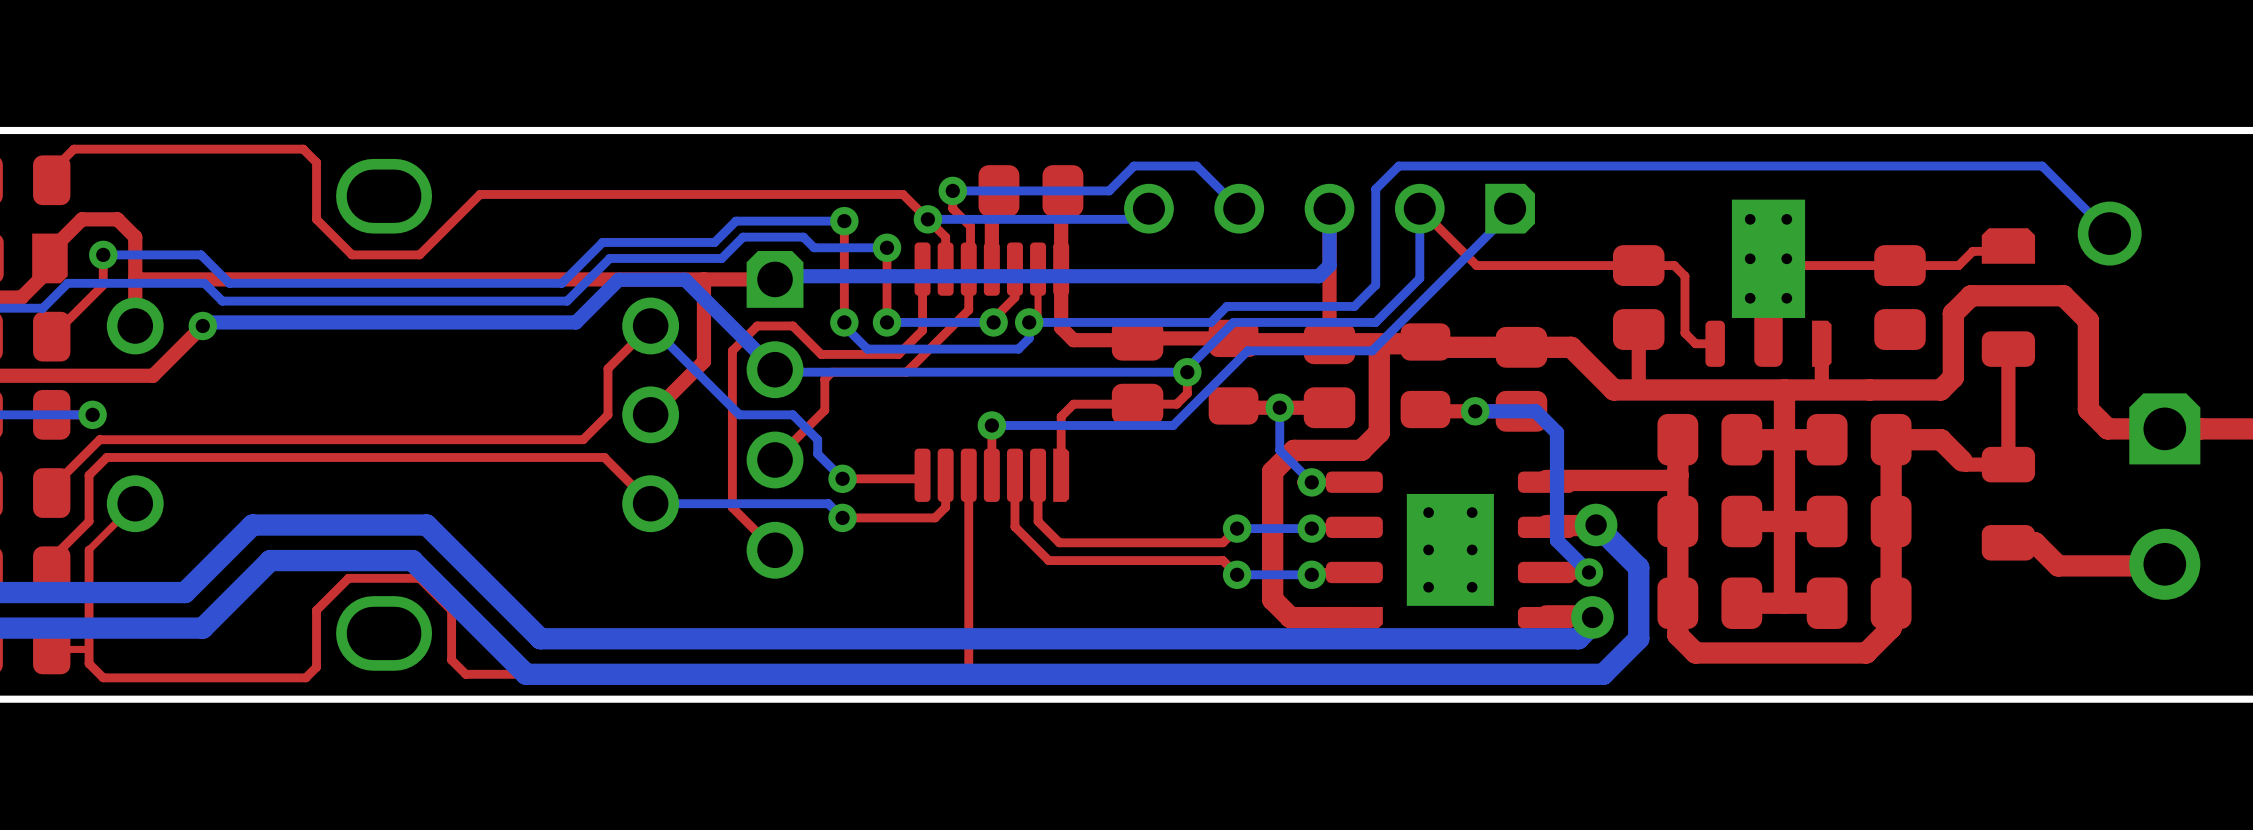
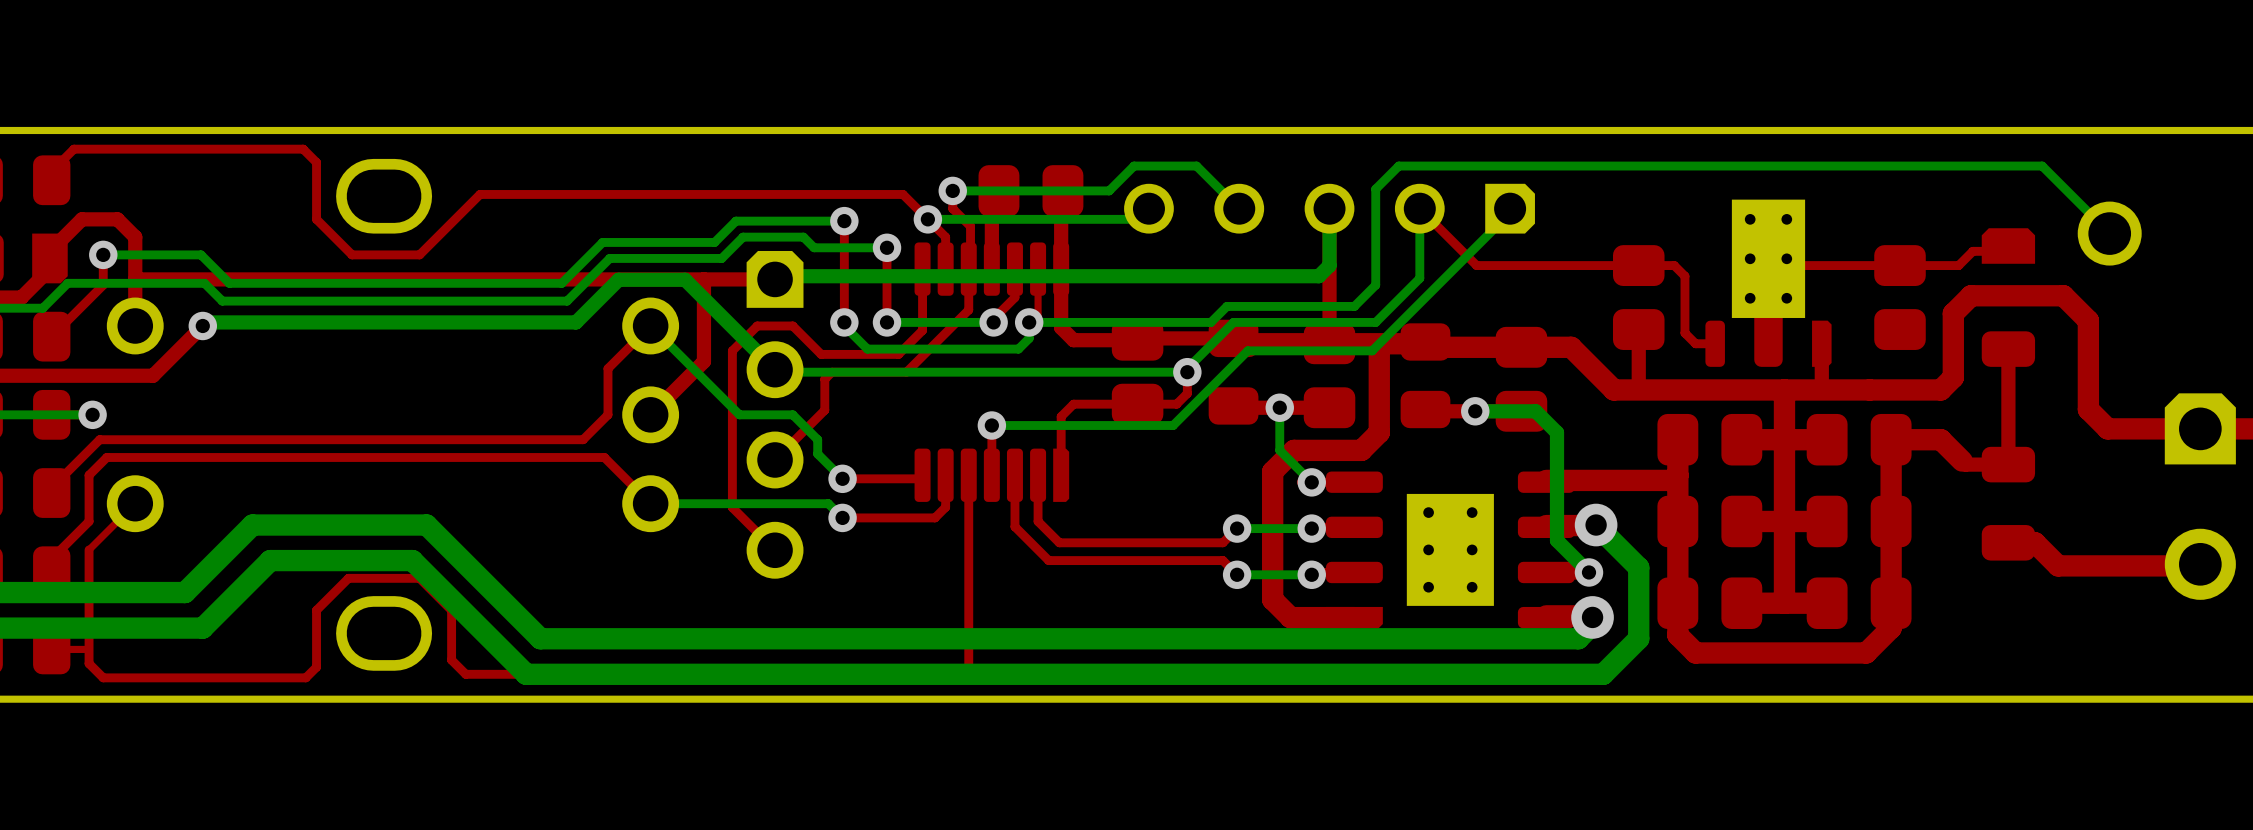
part position: (2164, 496) -> (2200, 496)

